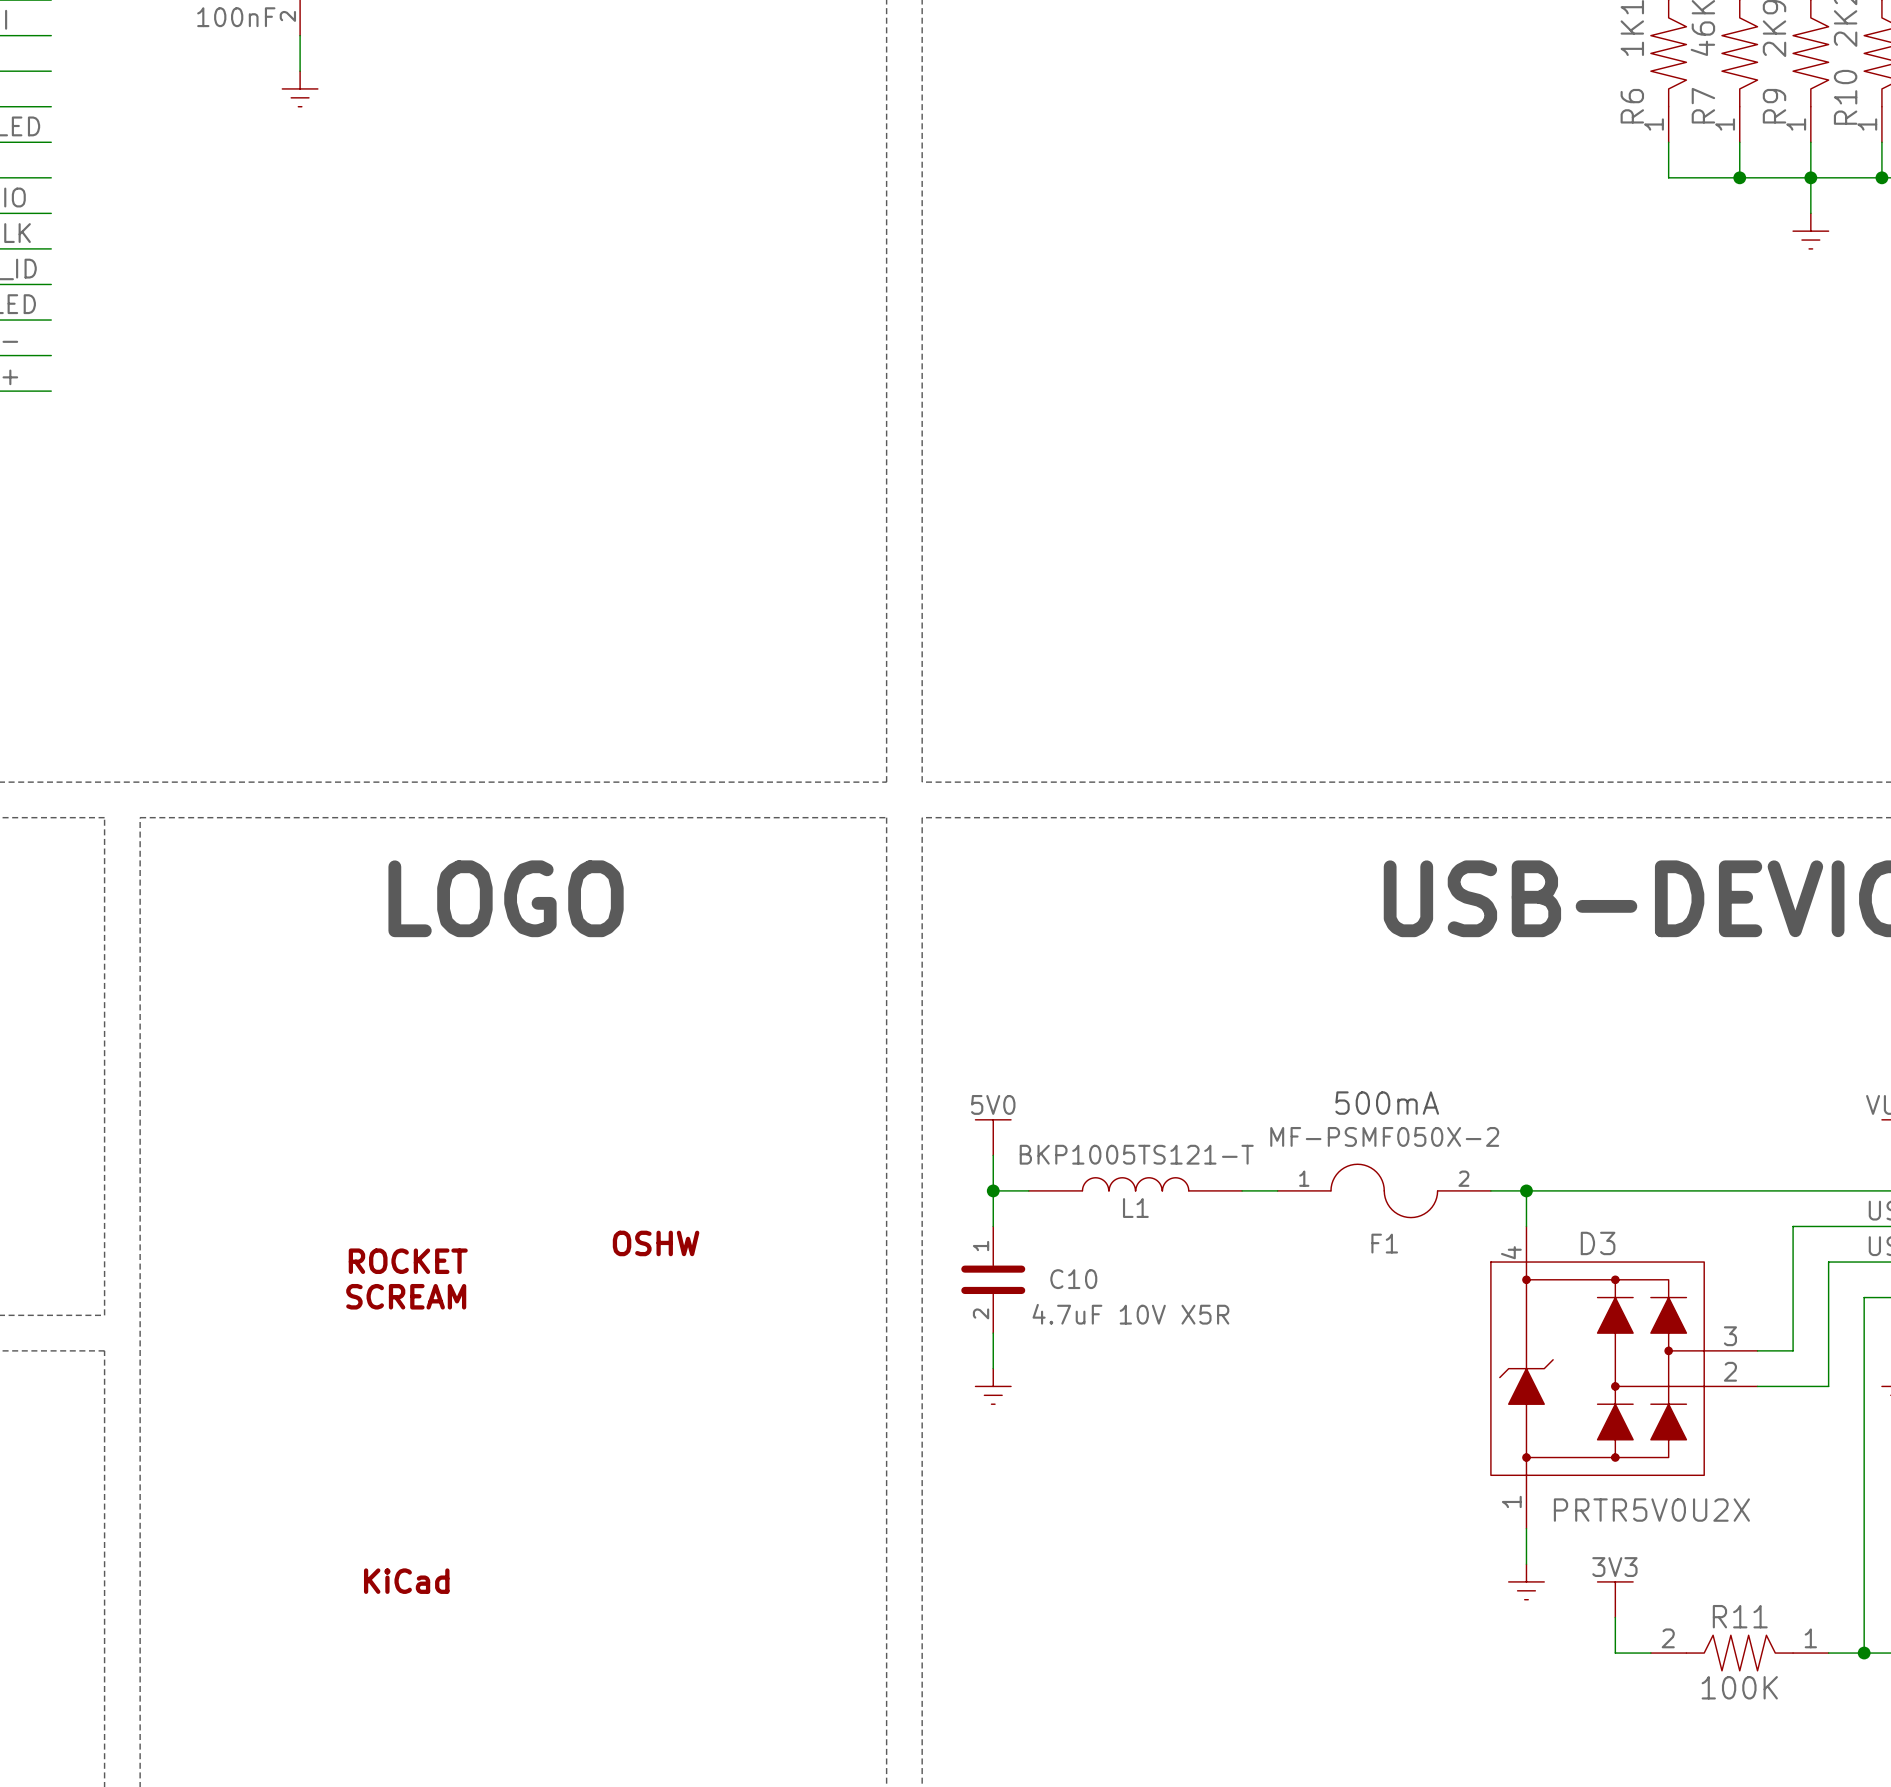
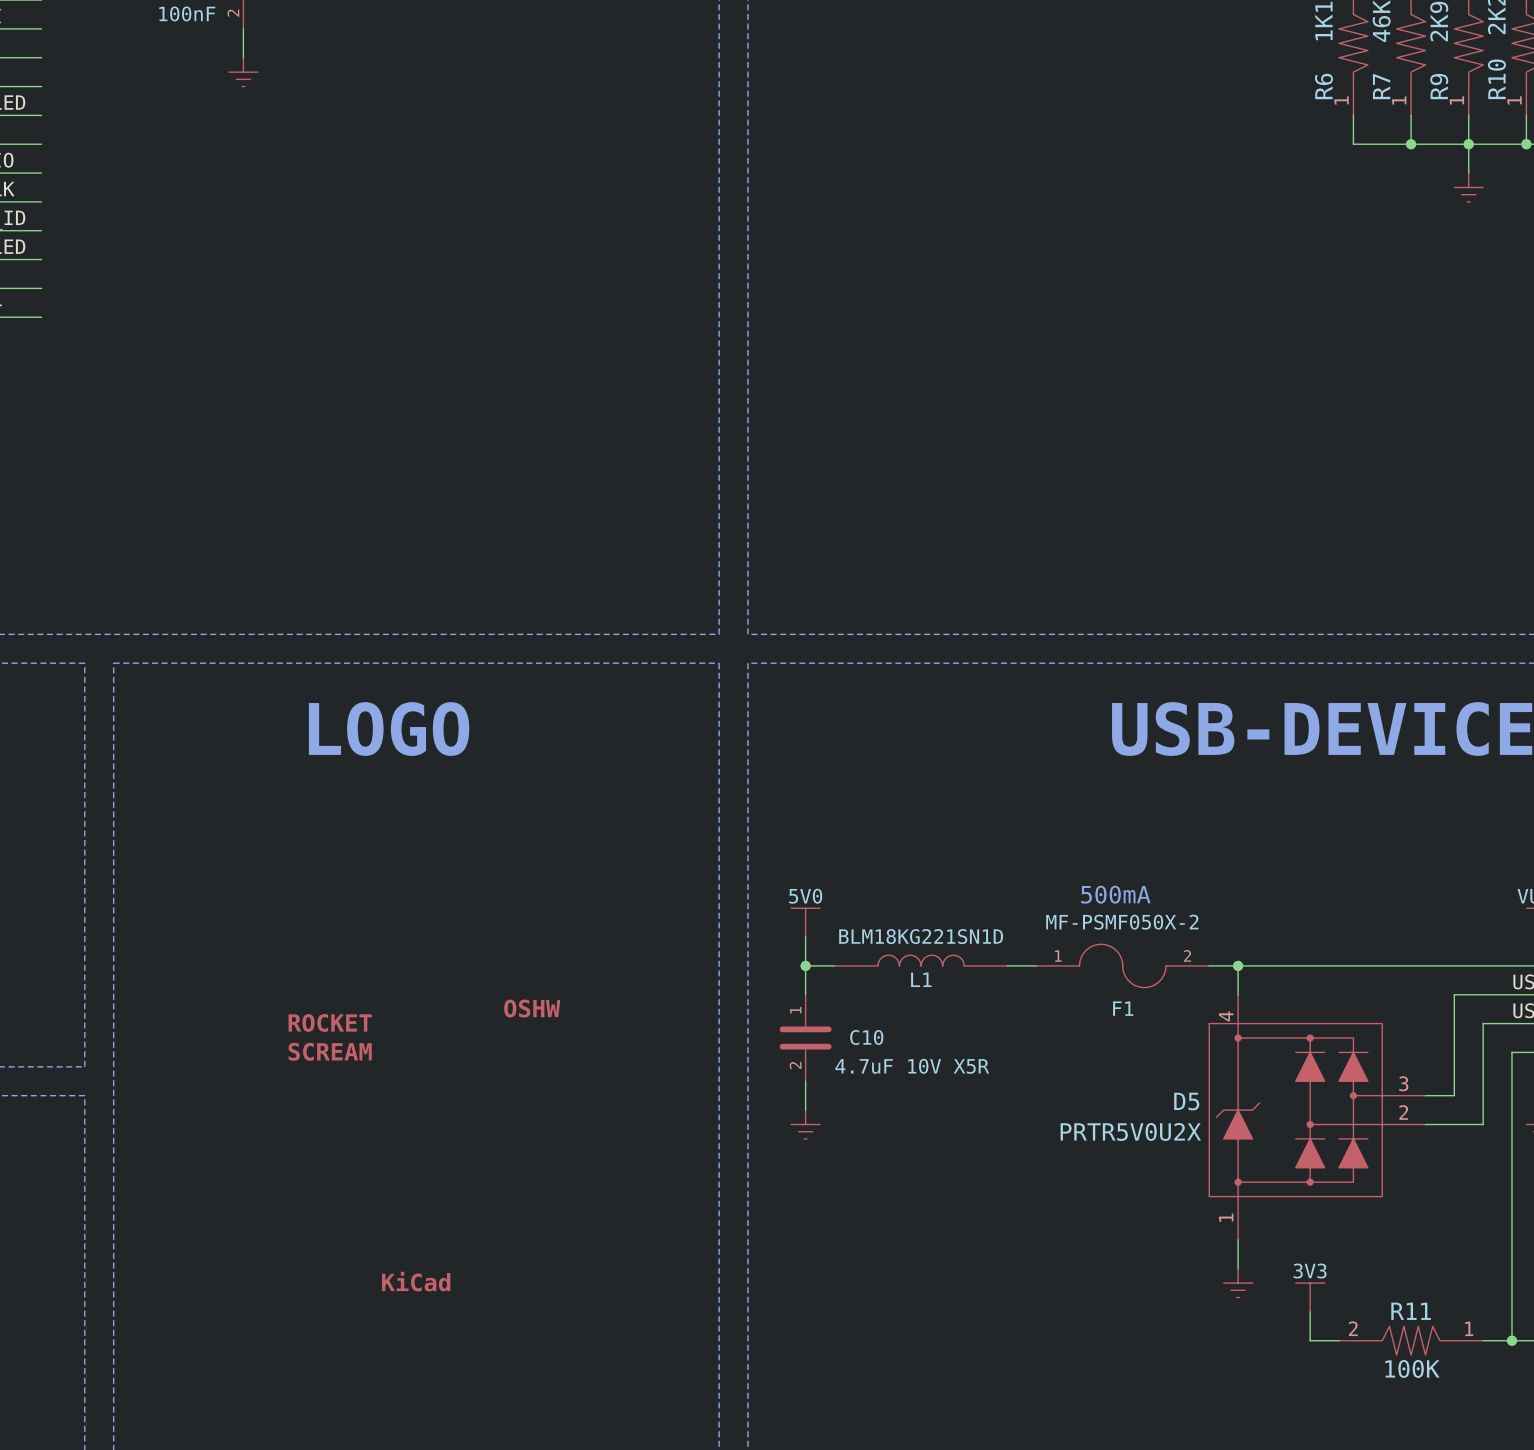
L1 value: BKP1005TS121-T (1136, 1154) -> BLM18KG221SN1D (921, 936)
D3 name: D3 (1598, 1243) -> D5 (1186, 1101)
D3 value position: PRTR5V0U2X (1651, 1510) -> PRTR5V0U2X (1130, 1131)
part position: (406, 1581) -> (416, 1281)

